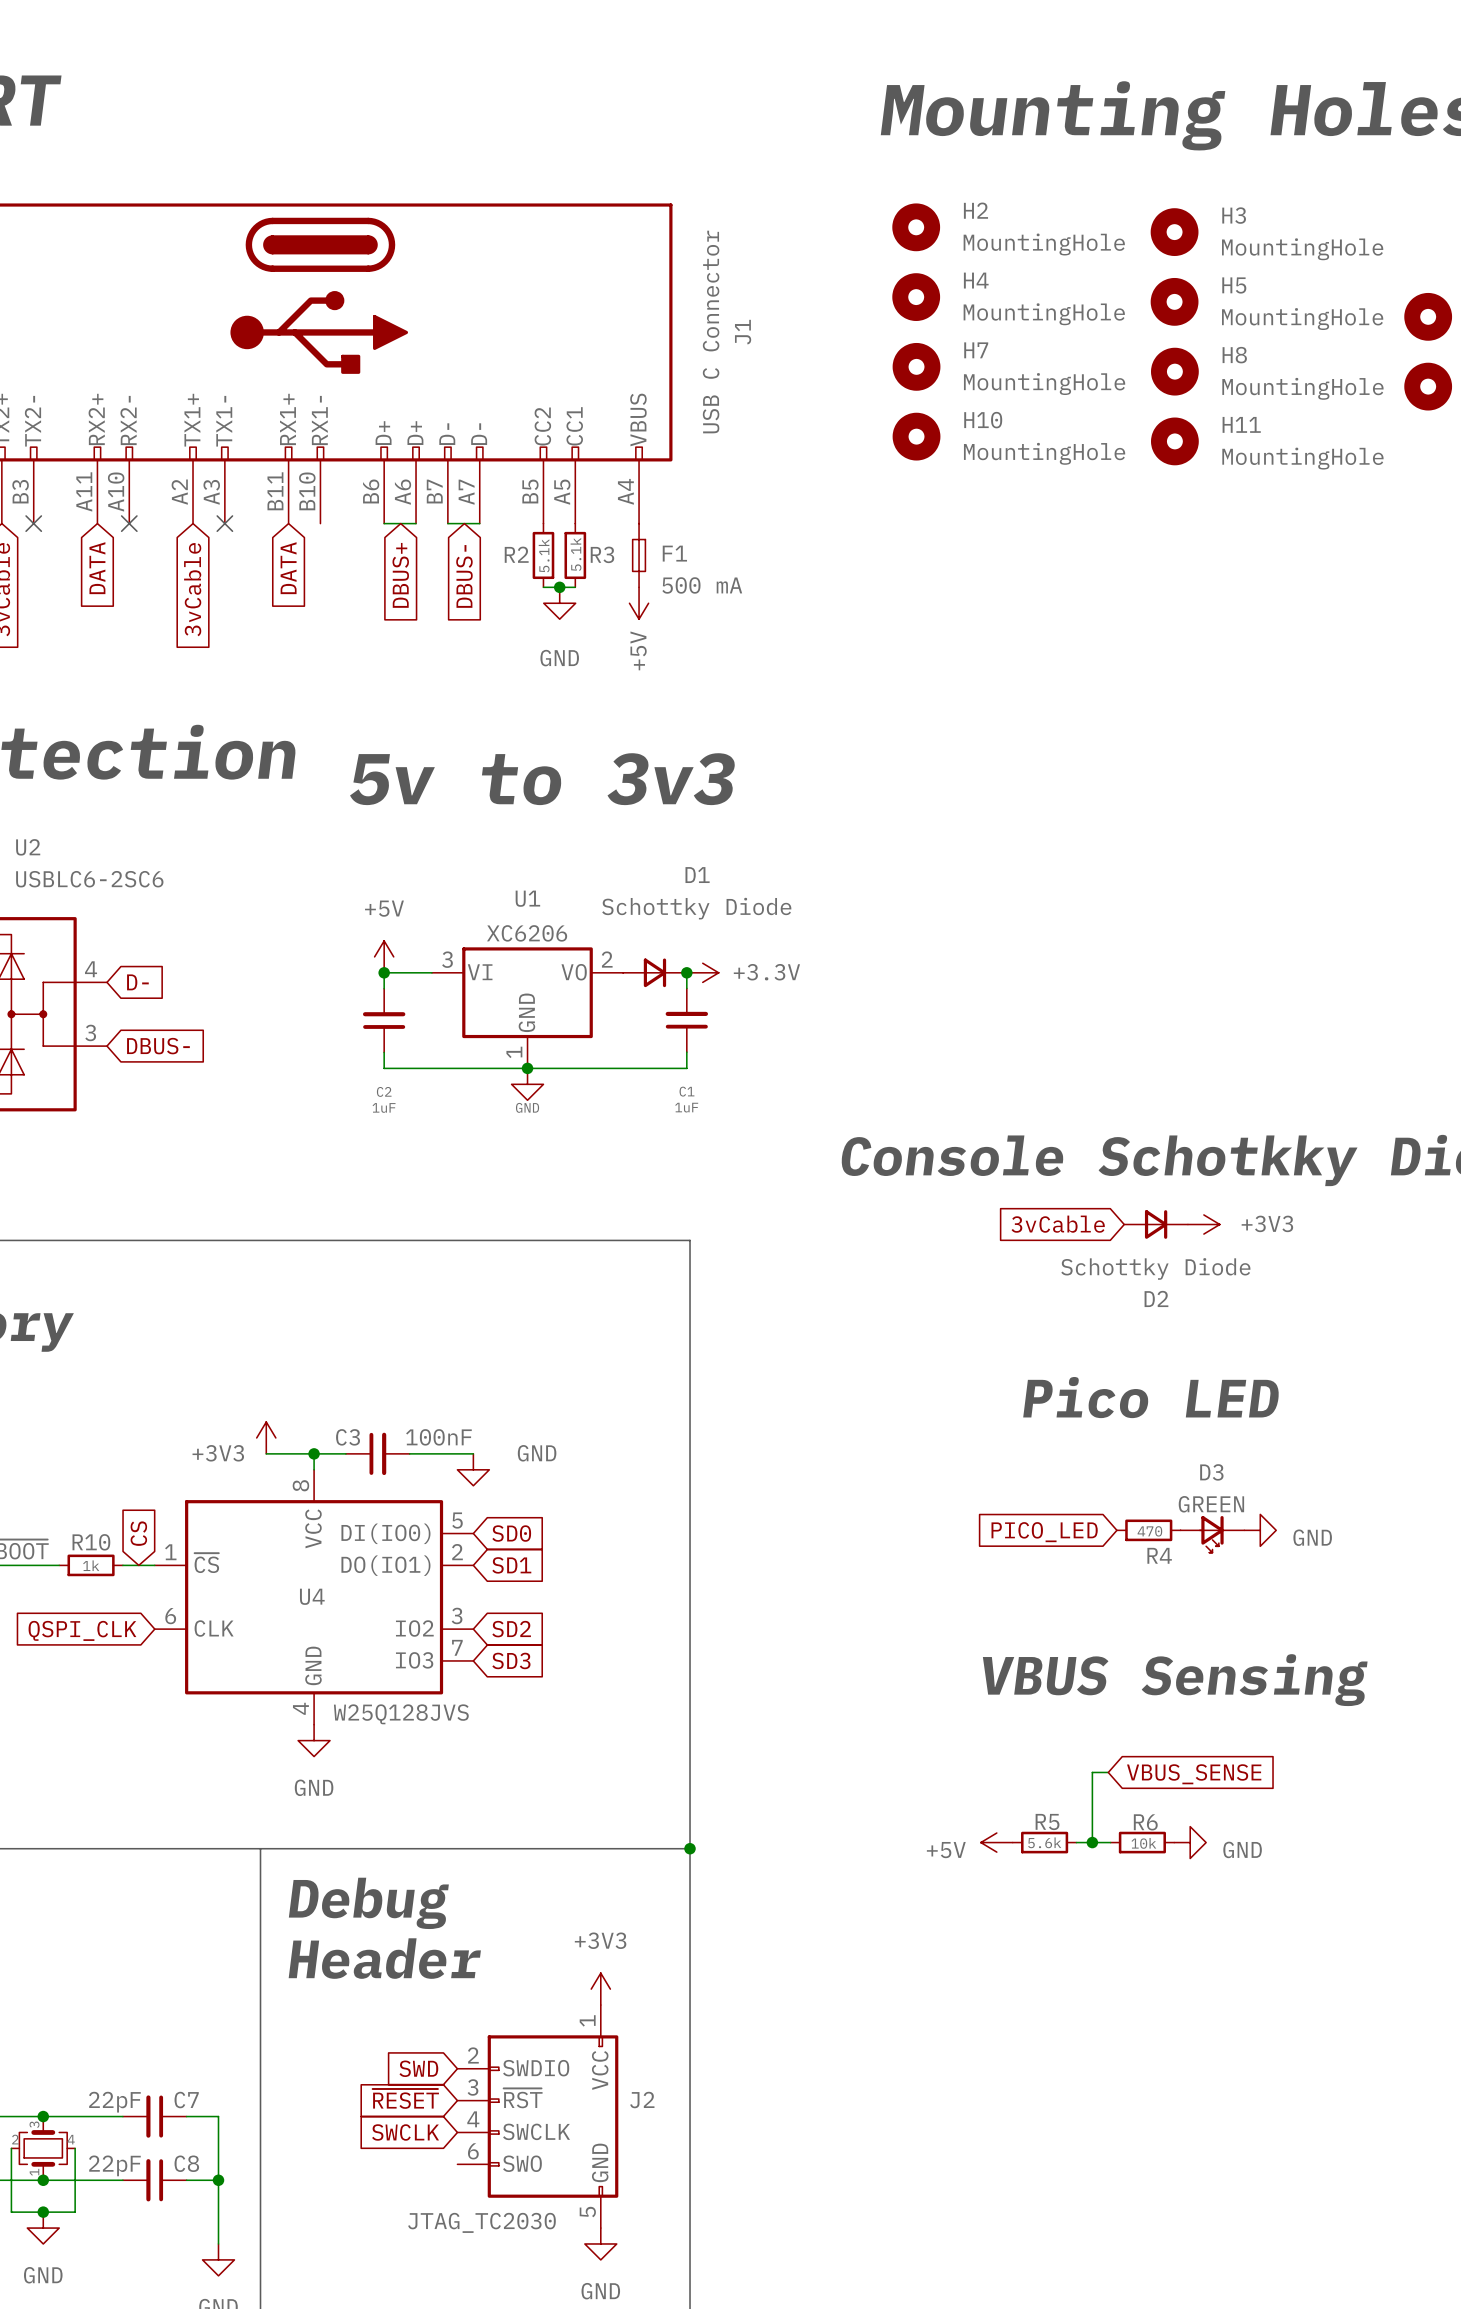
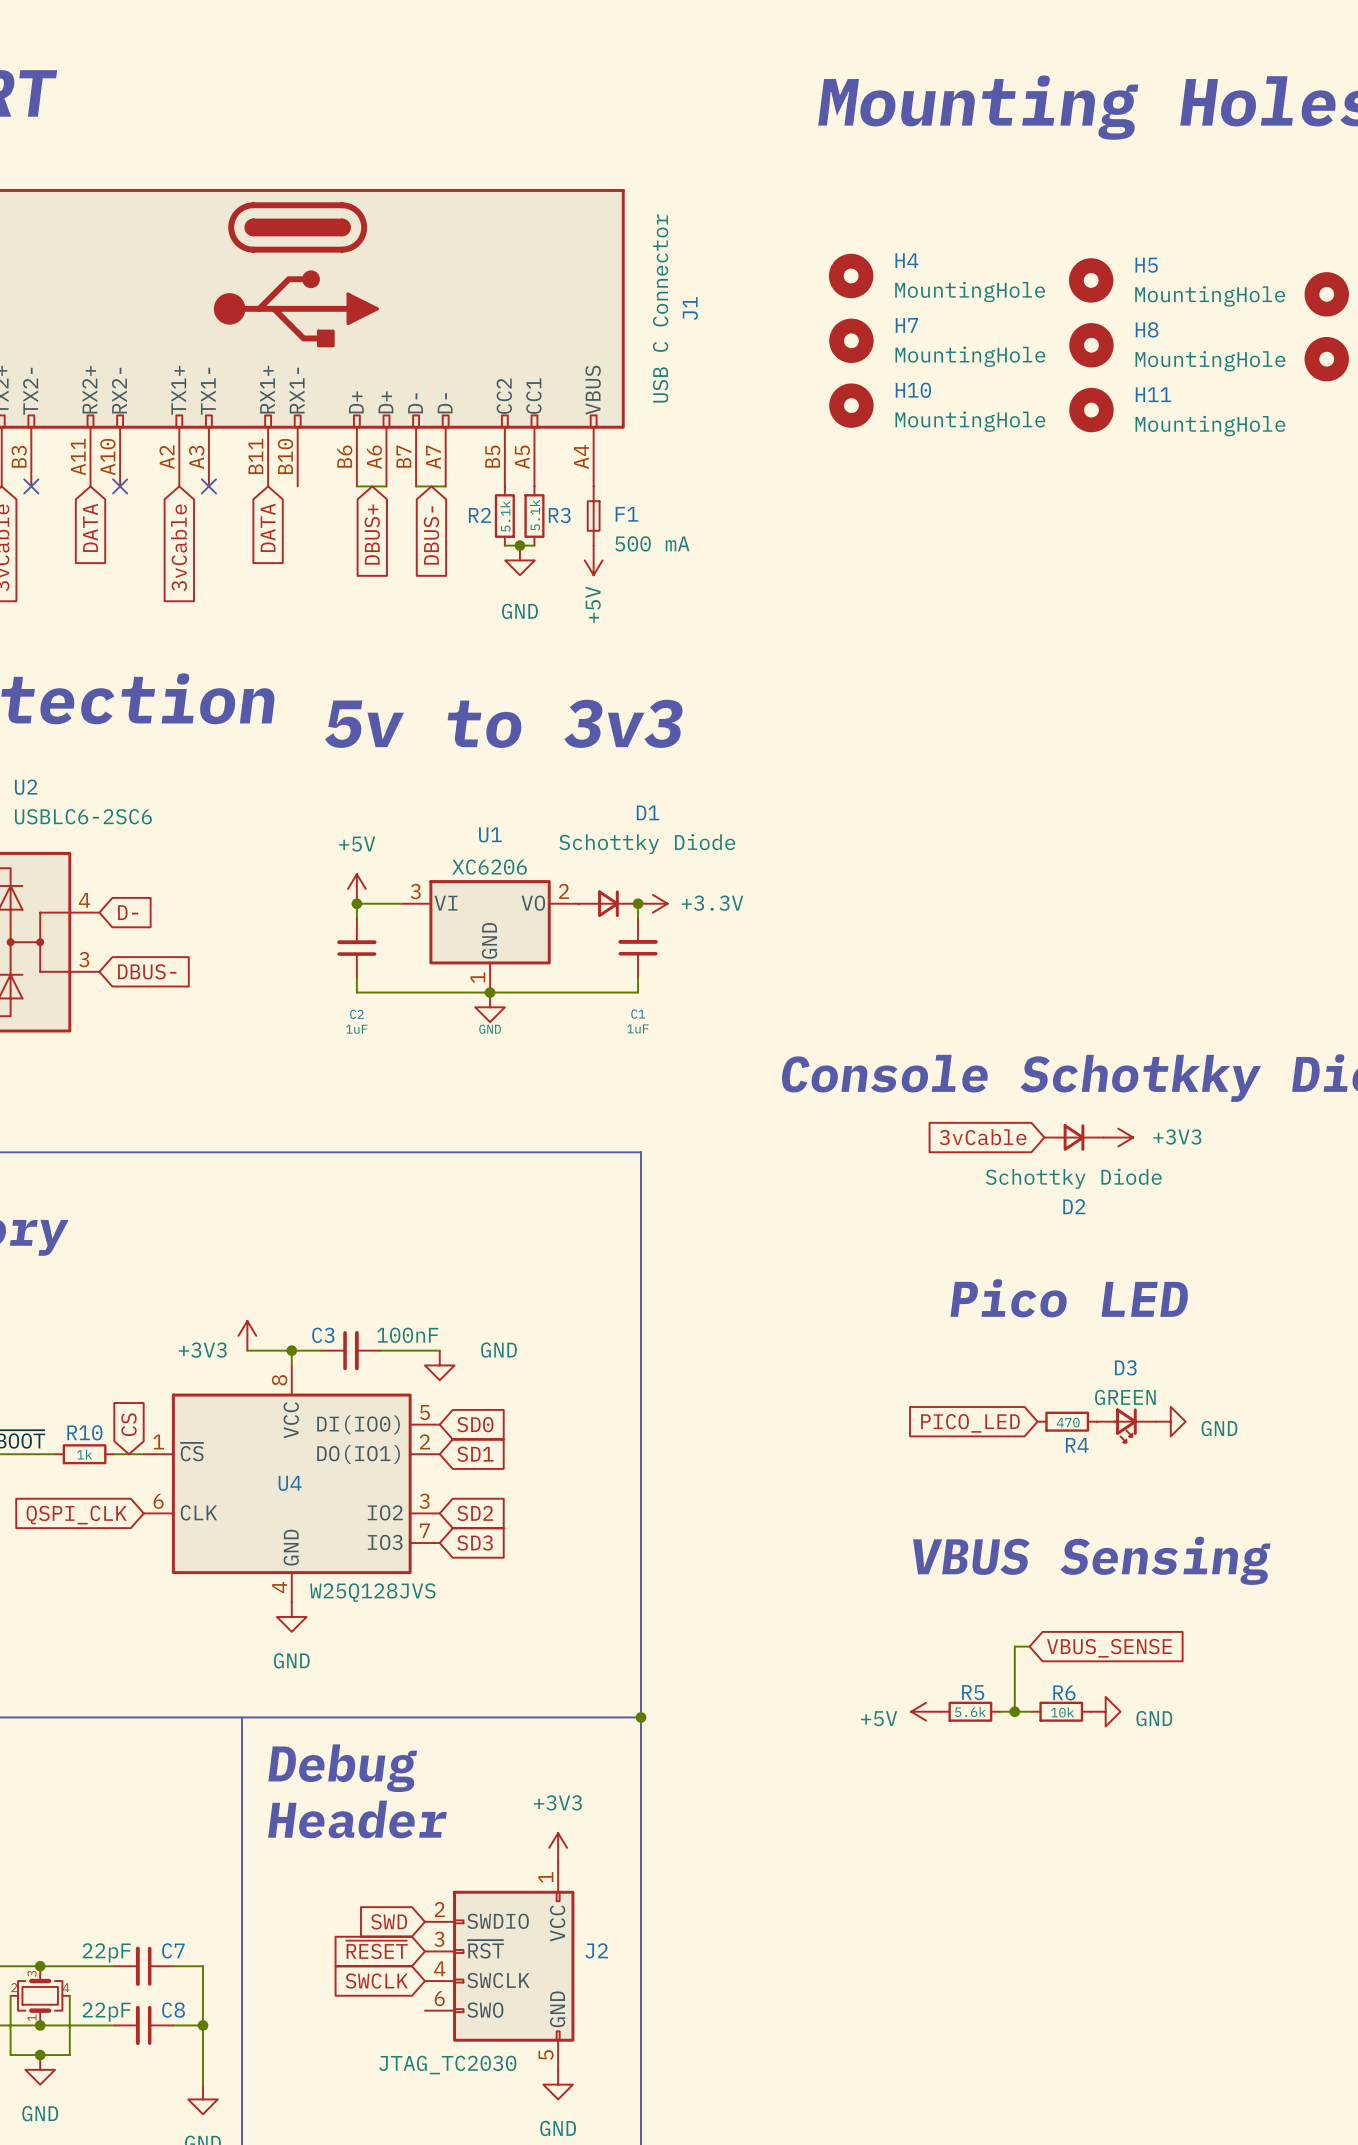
H2: MountingHole (916, 227) -> none
H3: MountingHole (1174, 232) -> none

